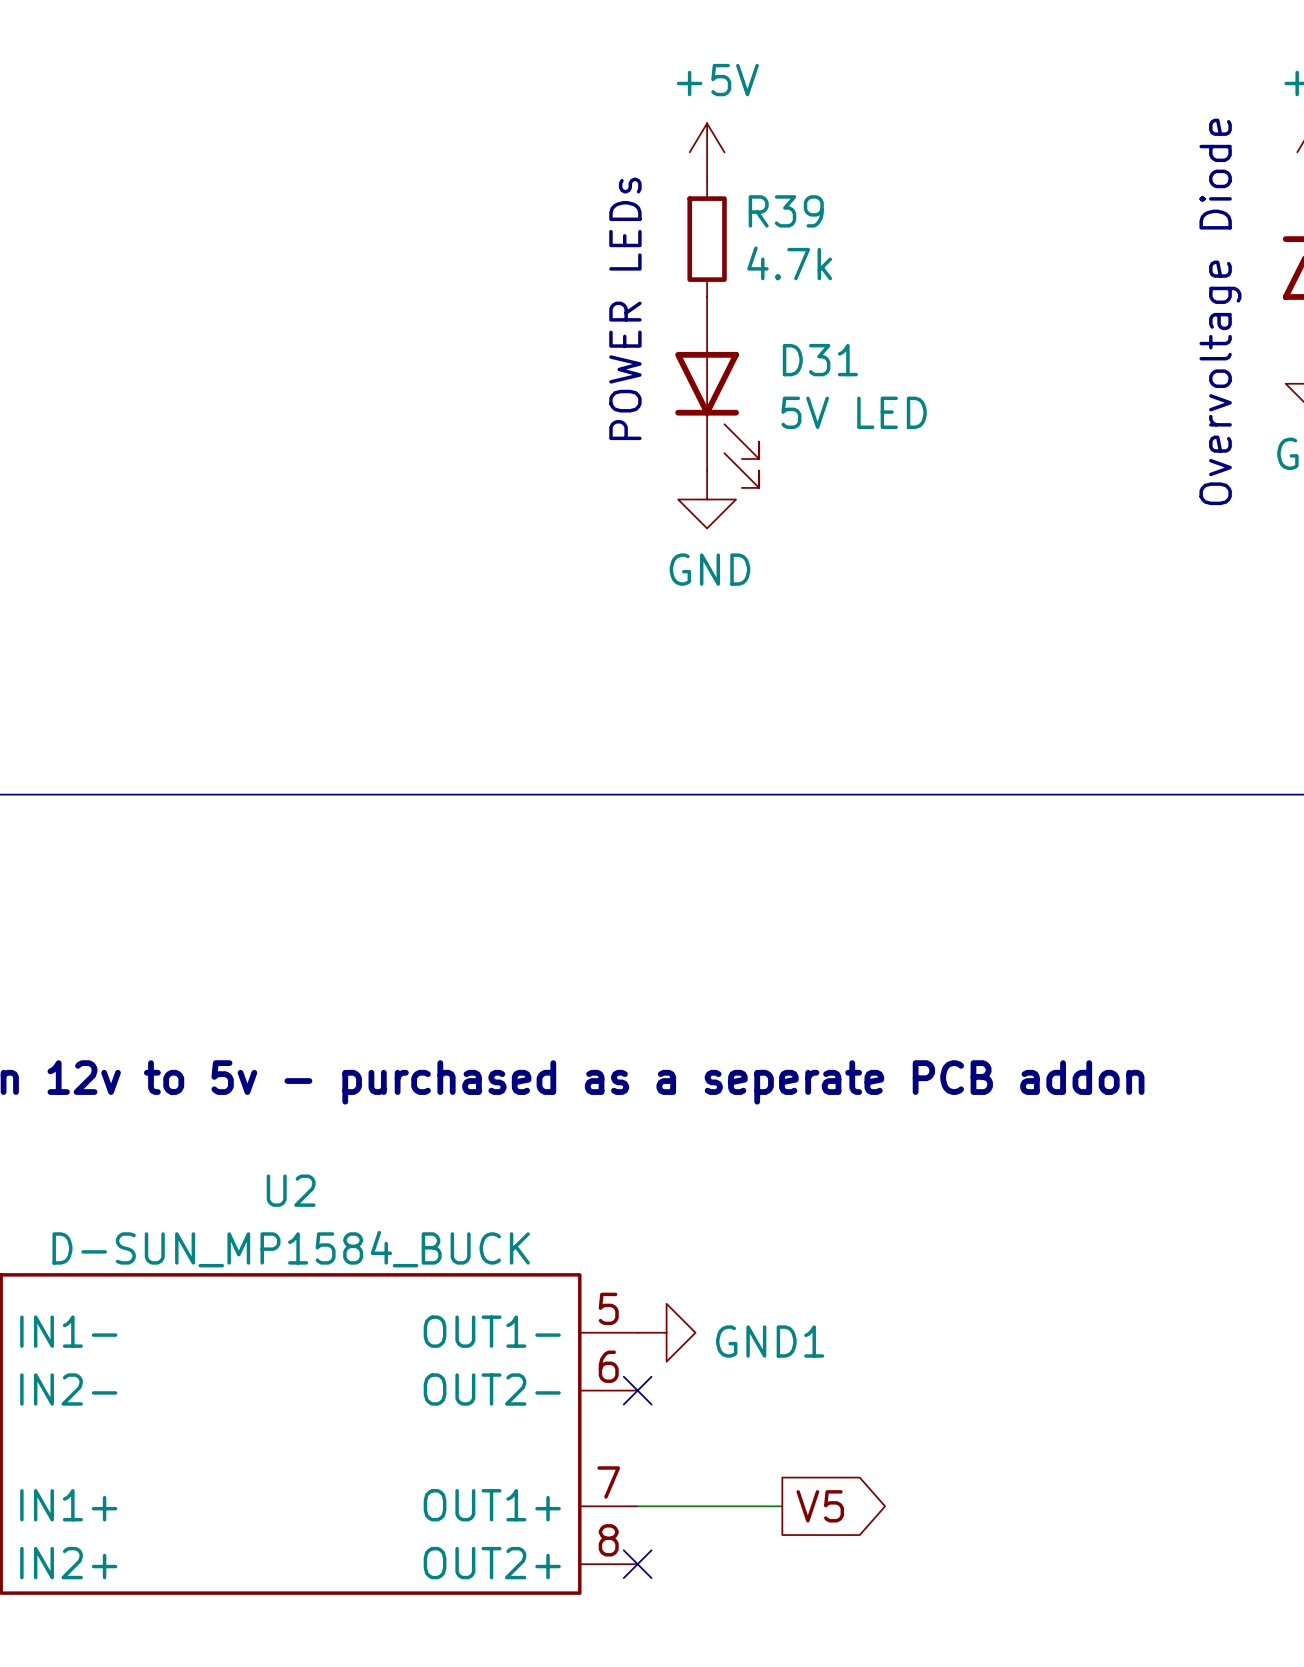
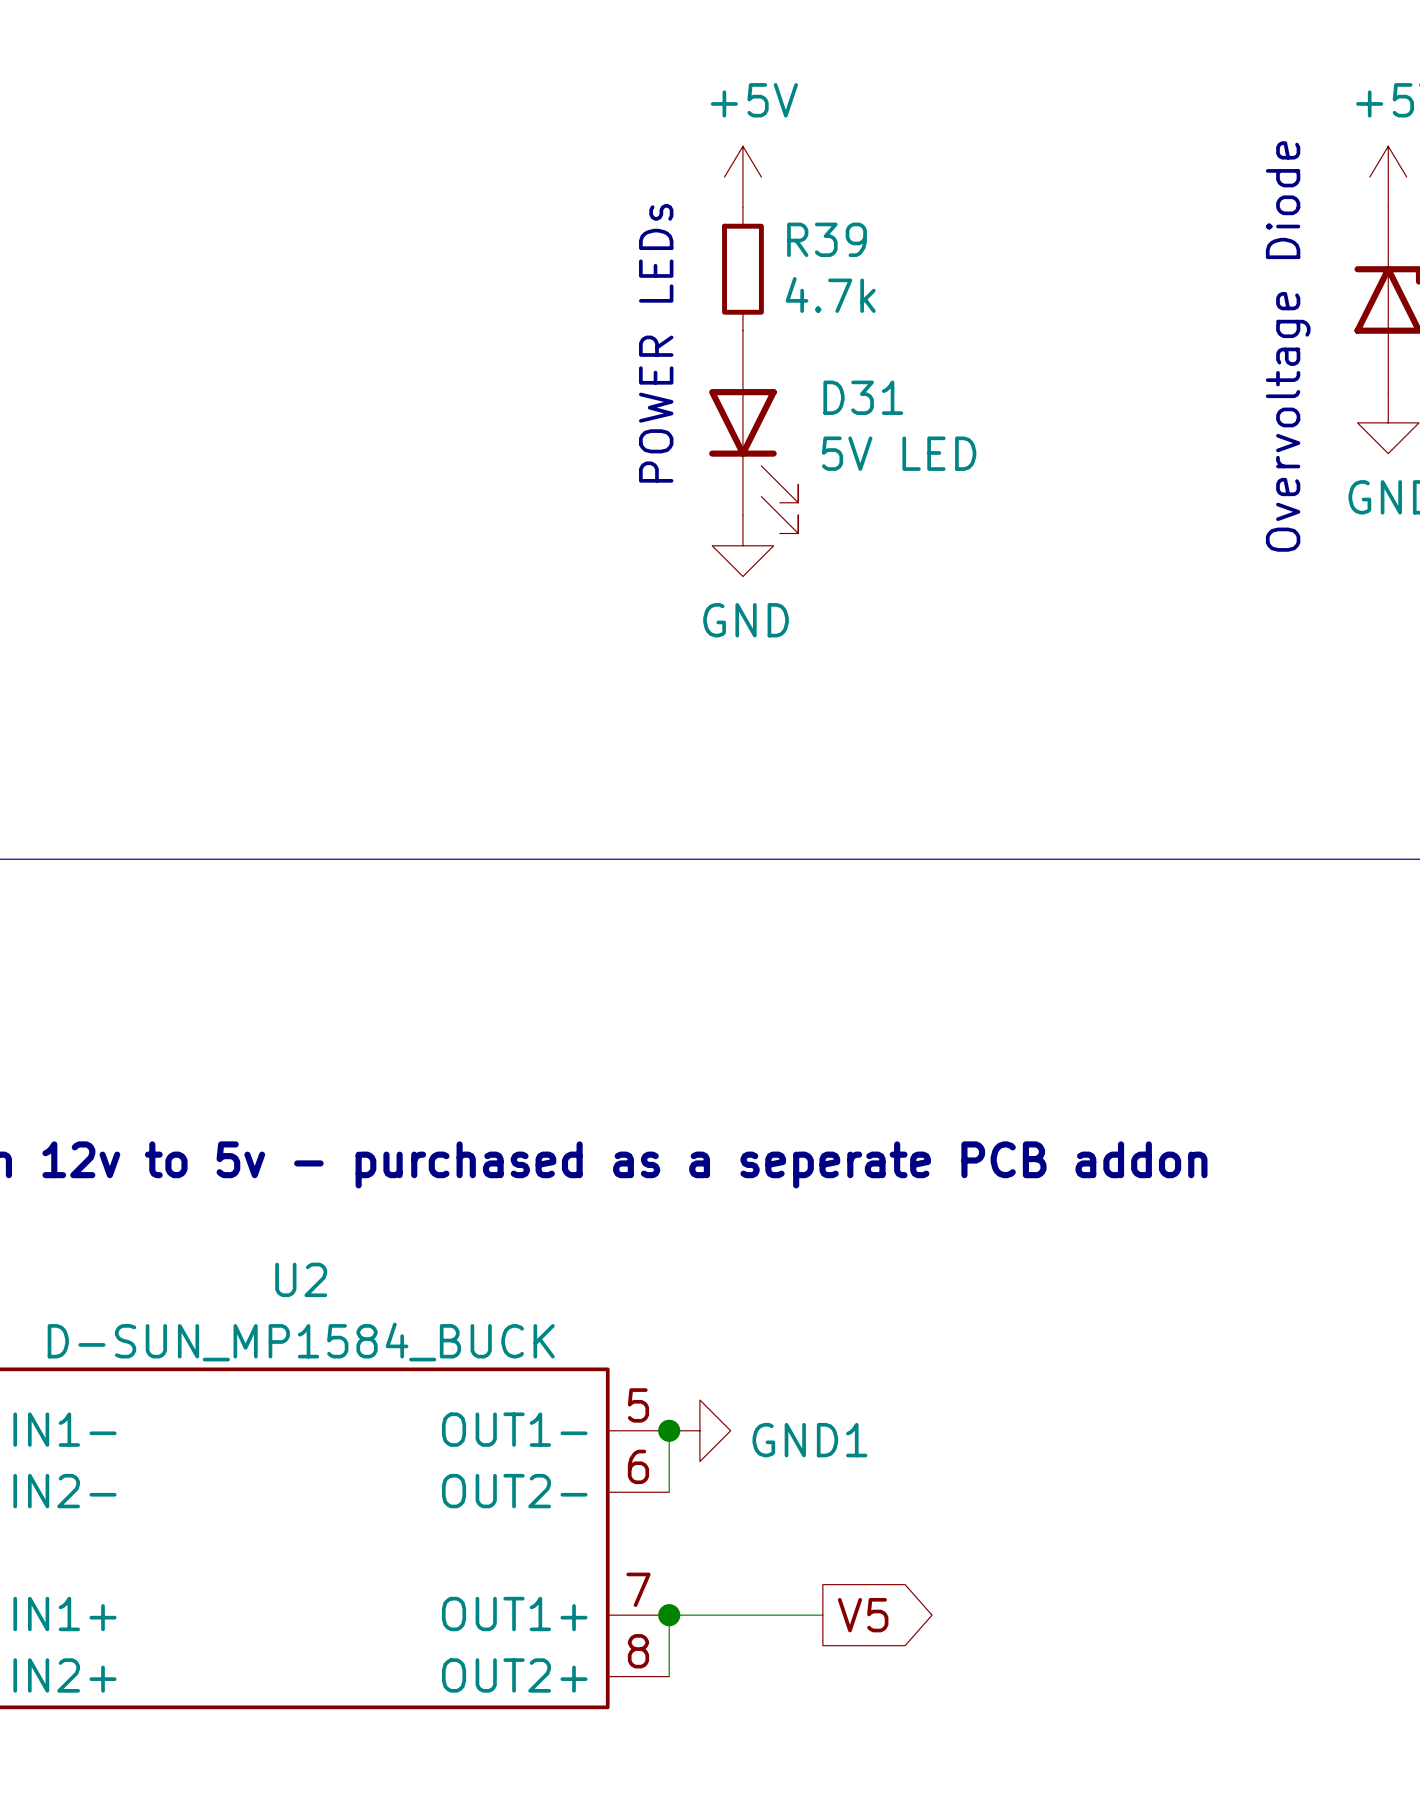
wire: none -> (669, 1430) (669, 1492)
junction: none -> (669, 1430)
no-connect mark: (637, 1390) -> none
wire: none -> (669, 1615) (669, 1676)
junction: none -> (669, 1615)
no-connect mark: (637, 1564) -> none

